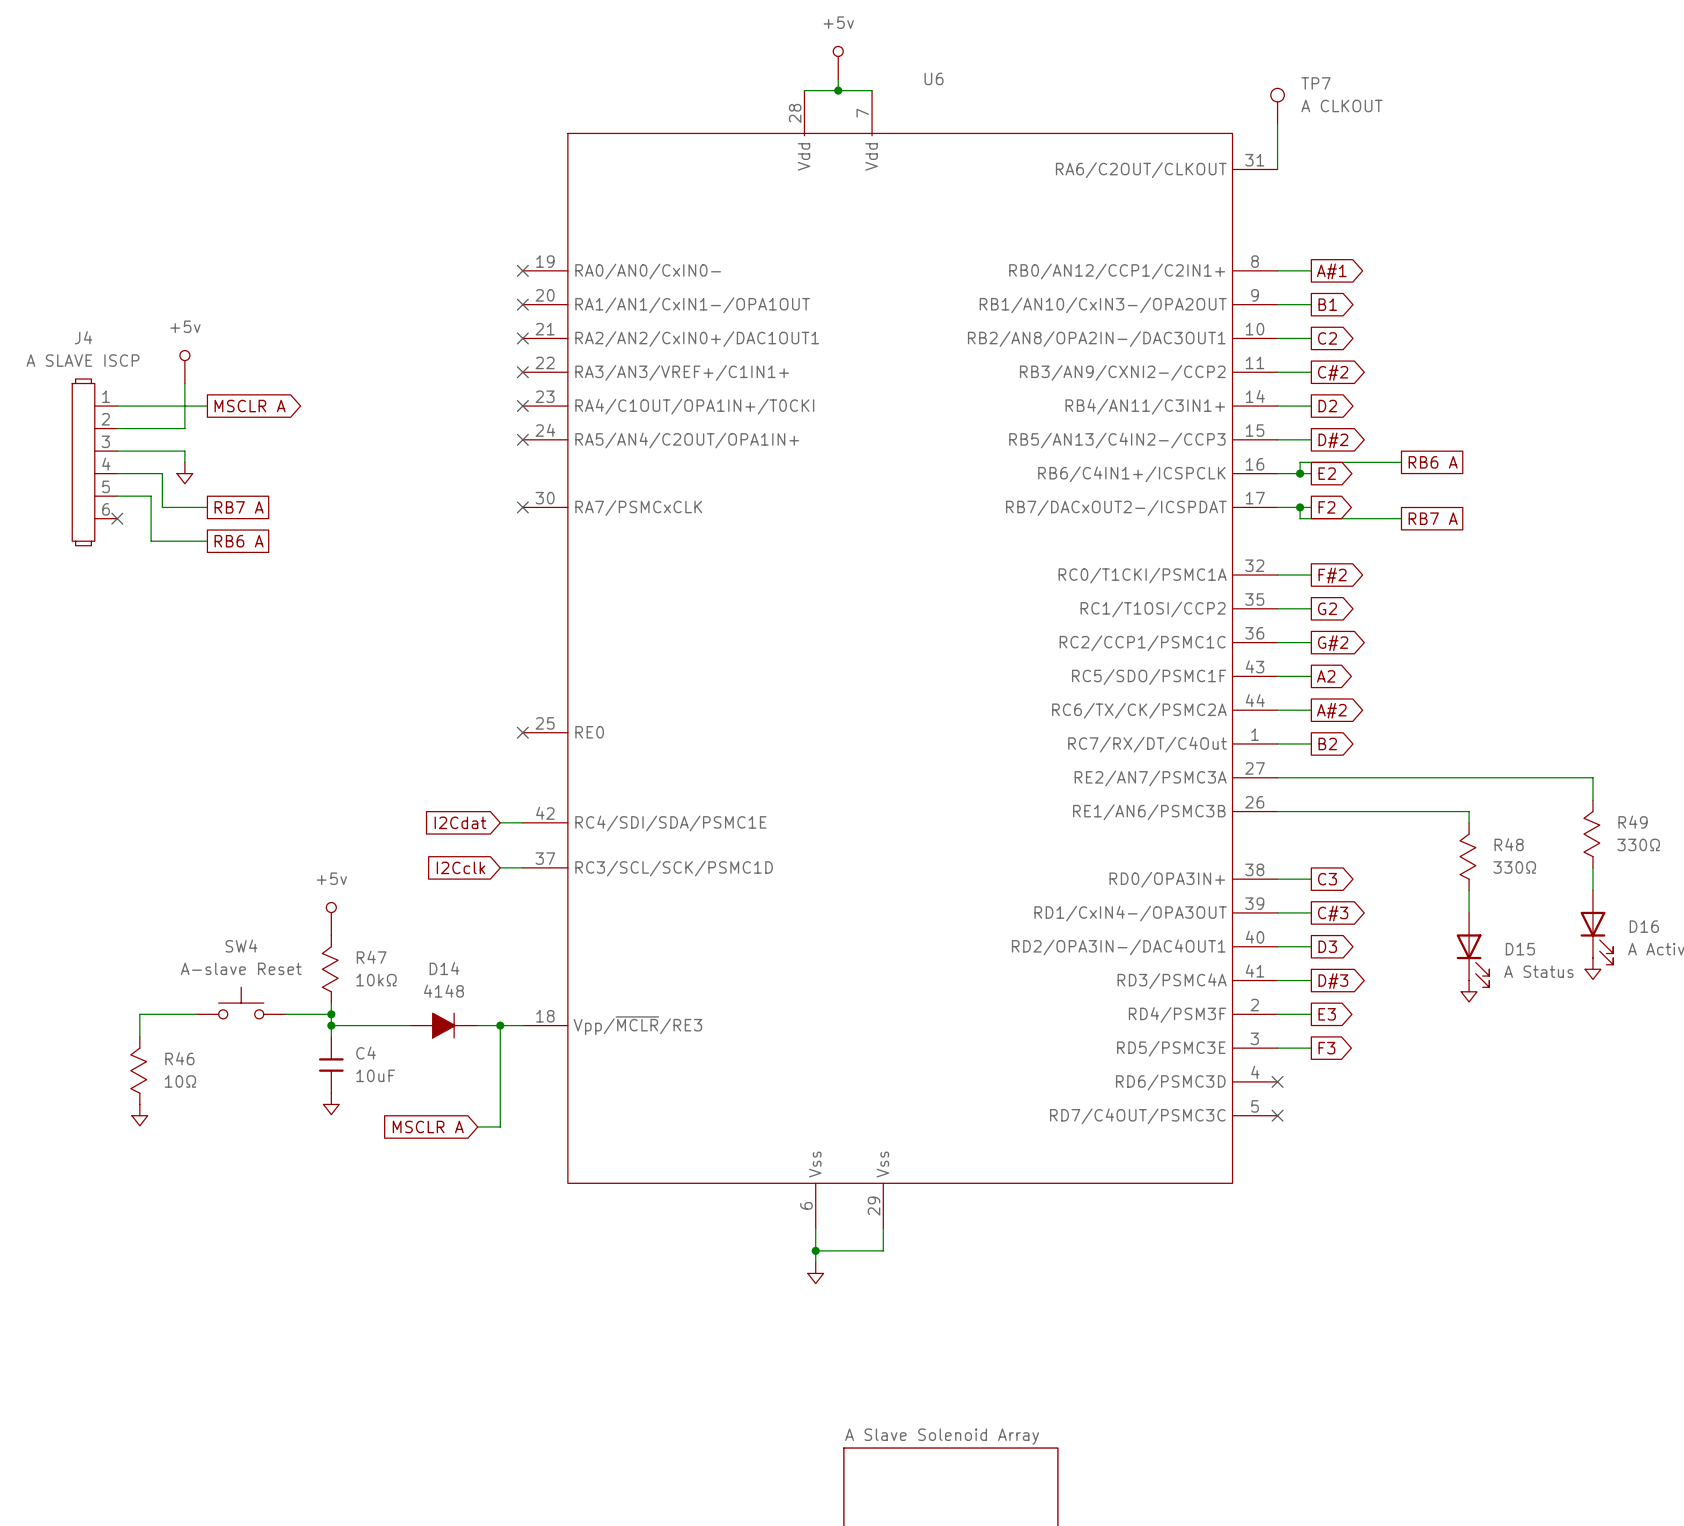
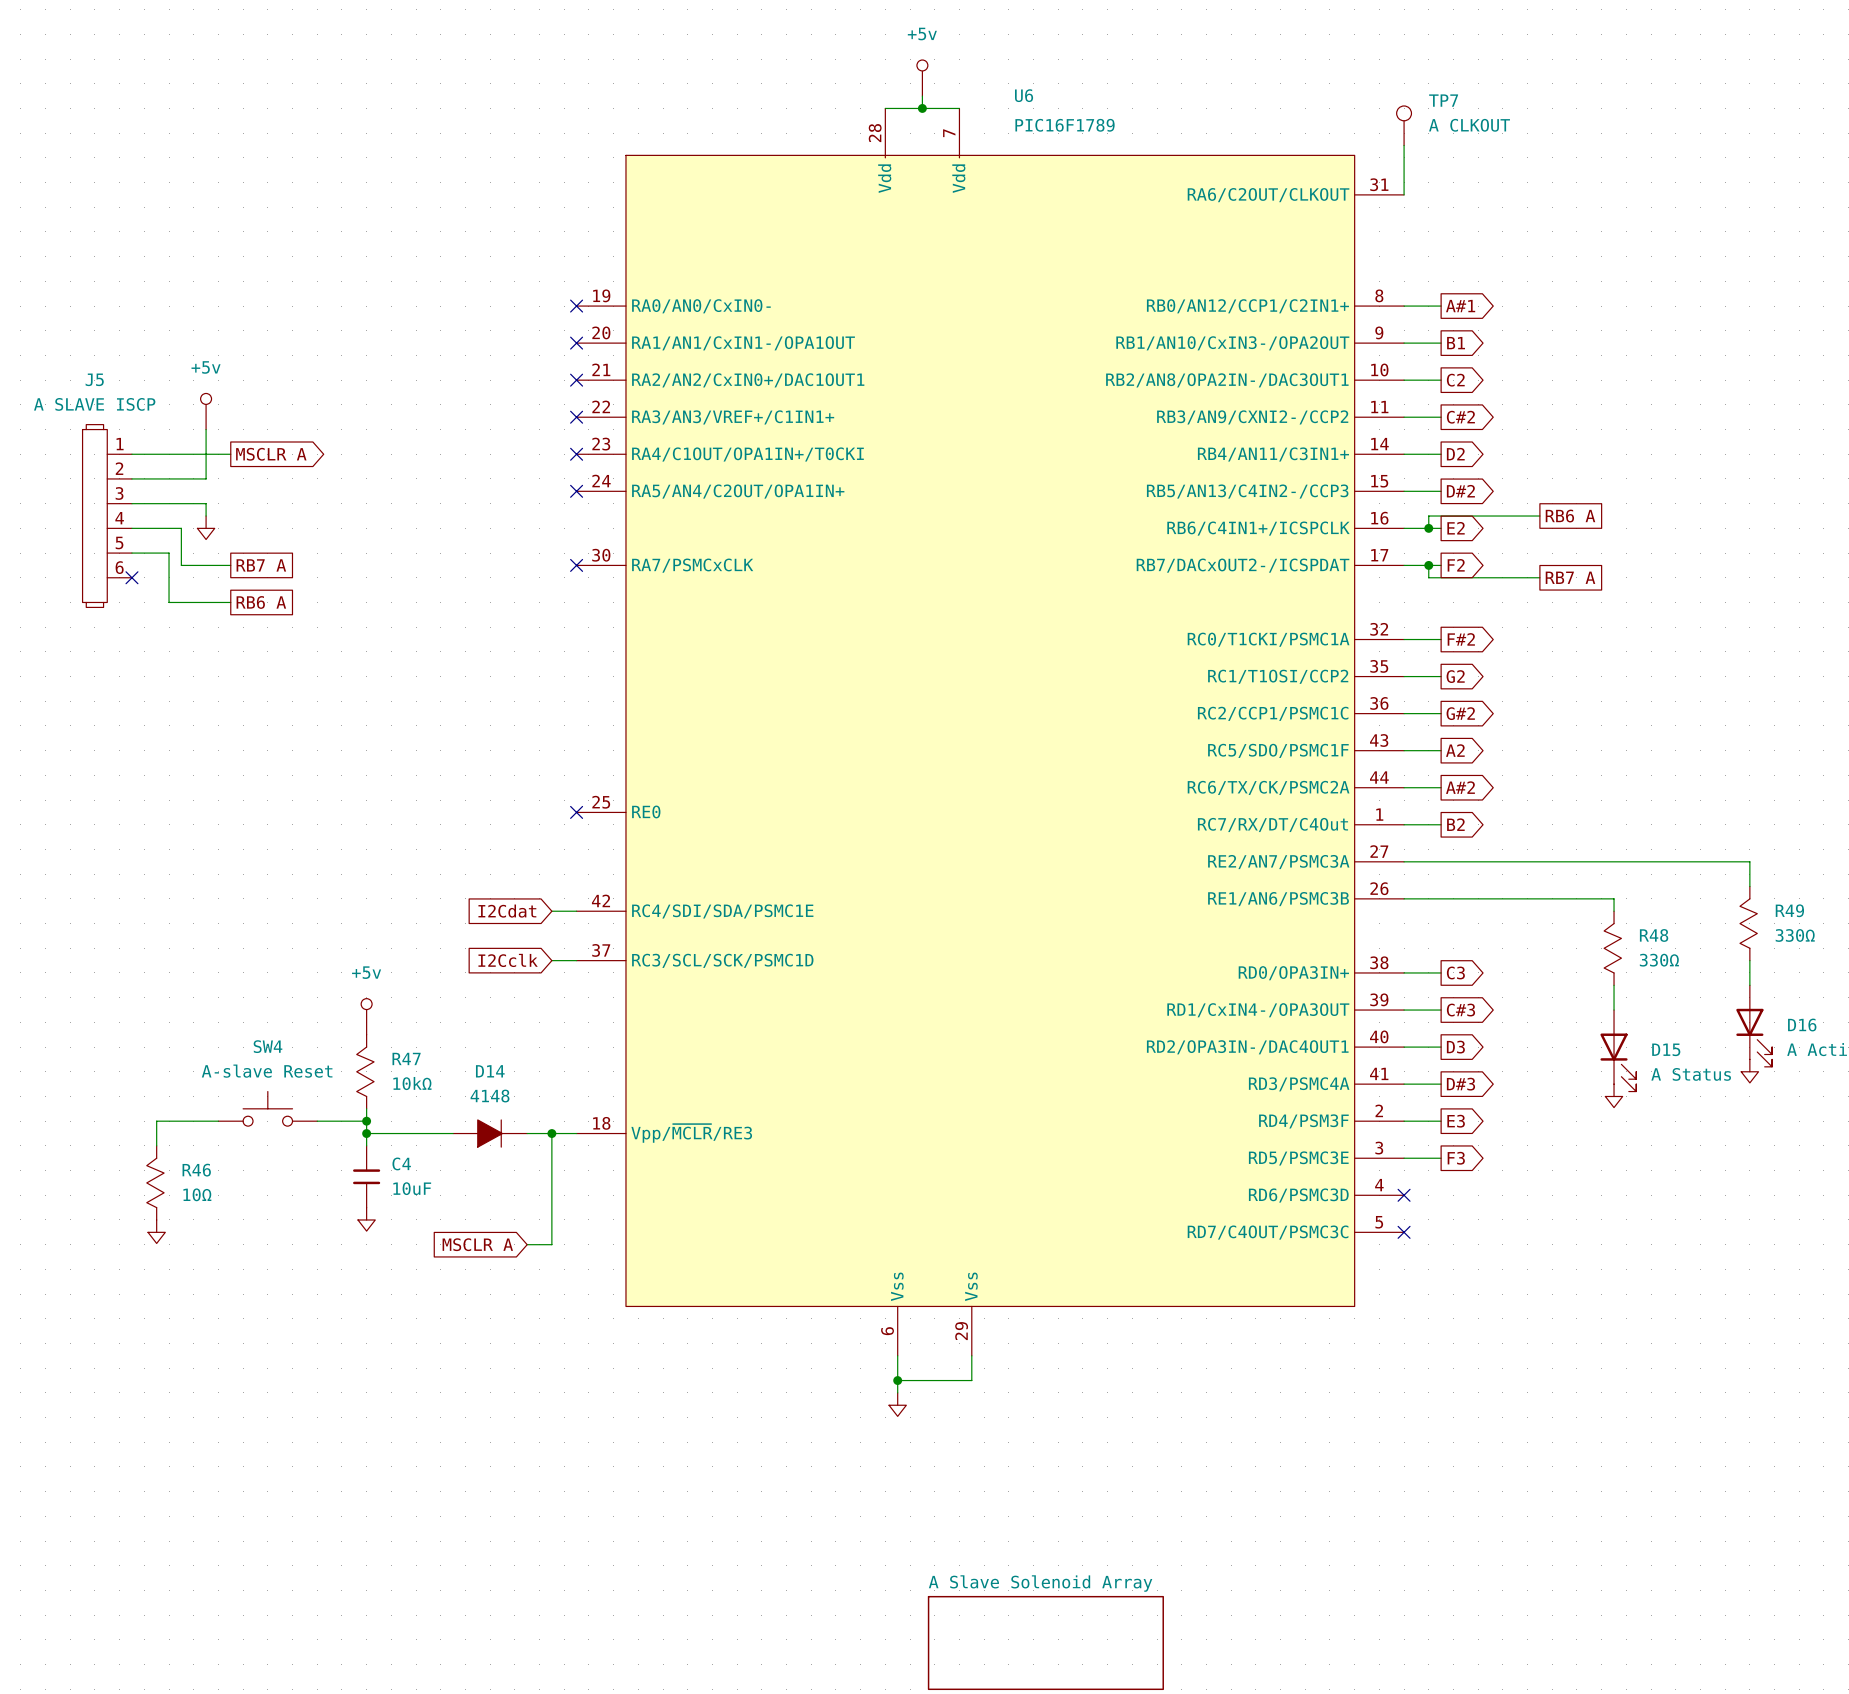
U6 value: none -> PIC16F1789 (1065, 125)
J4 name: J4 (83, 337) -> J5 (94, 379)

